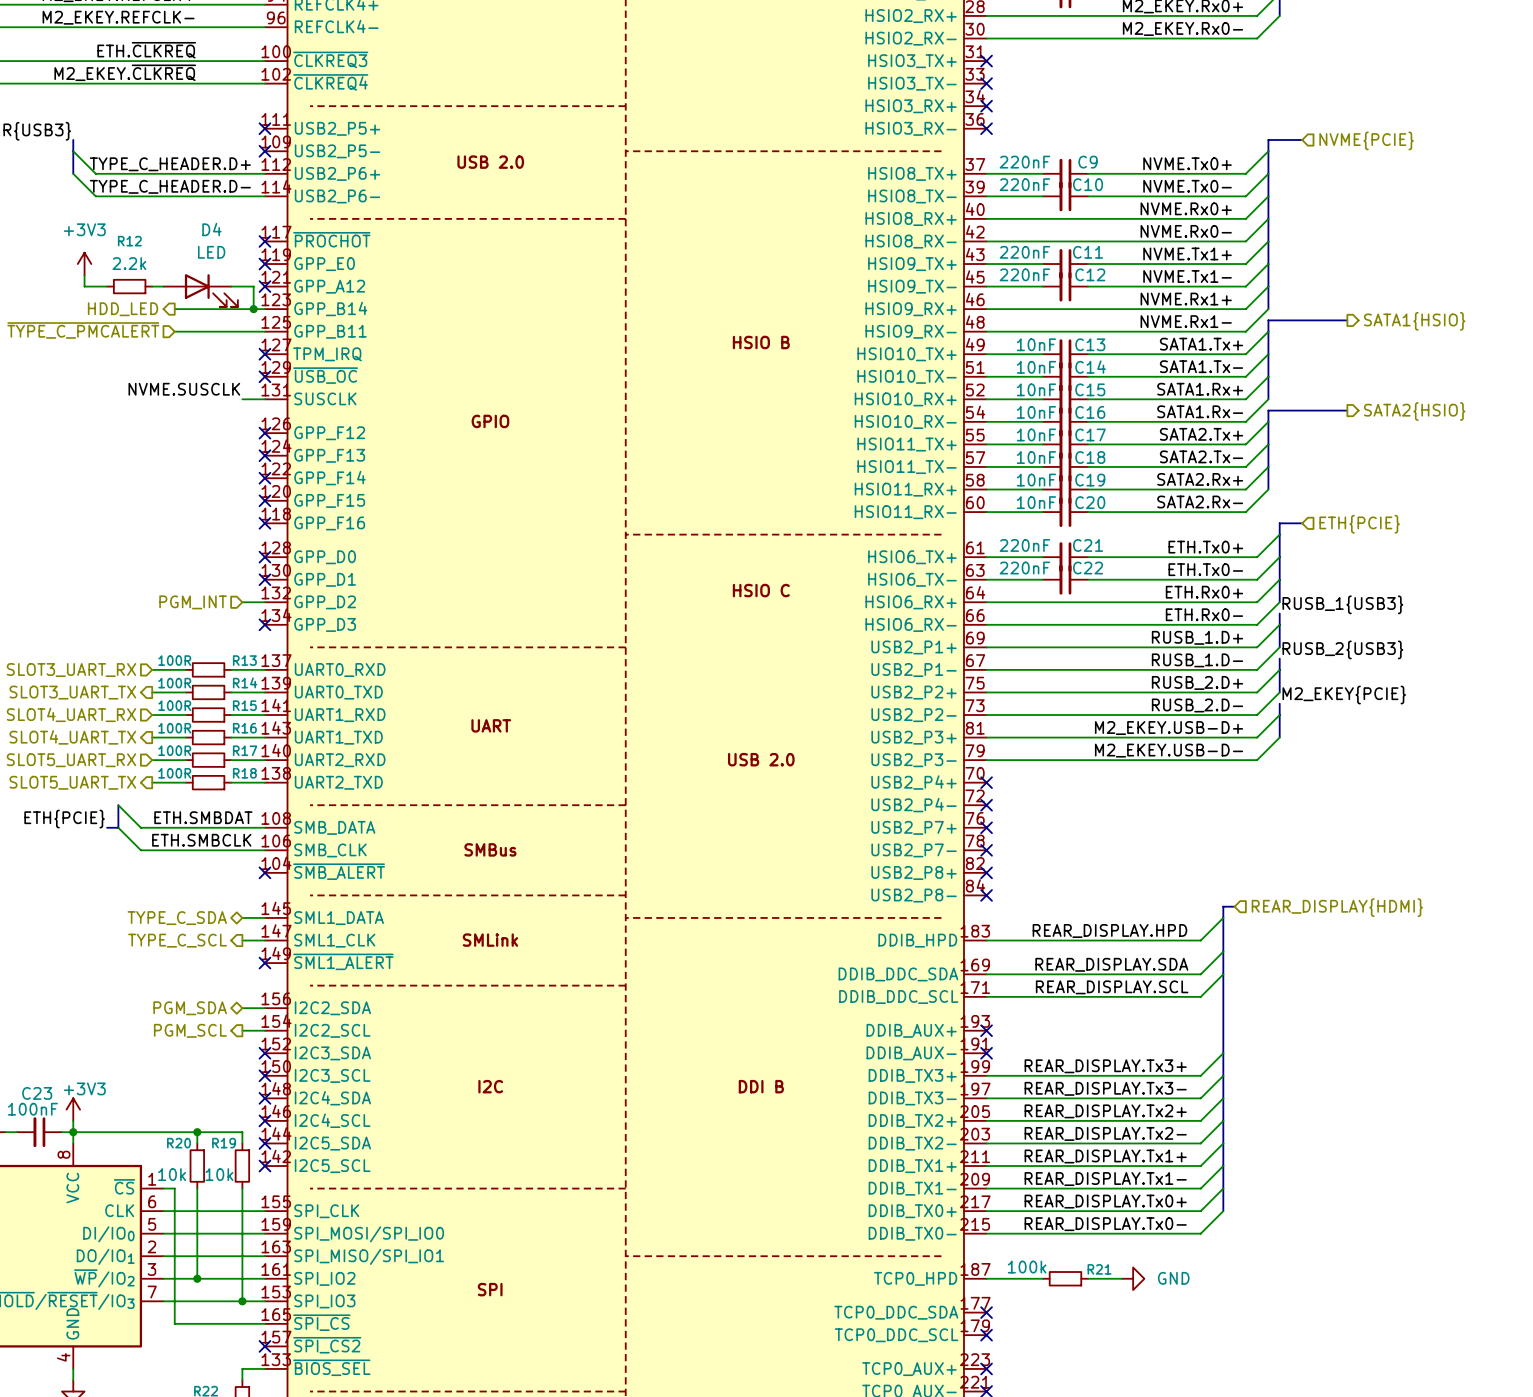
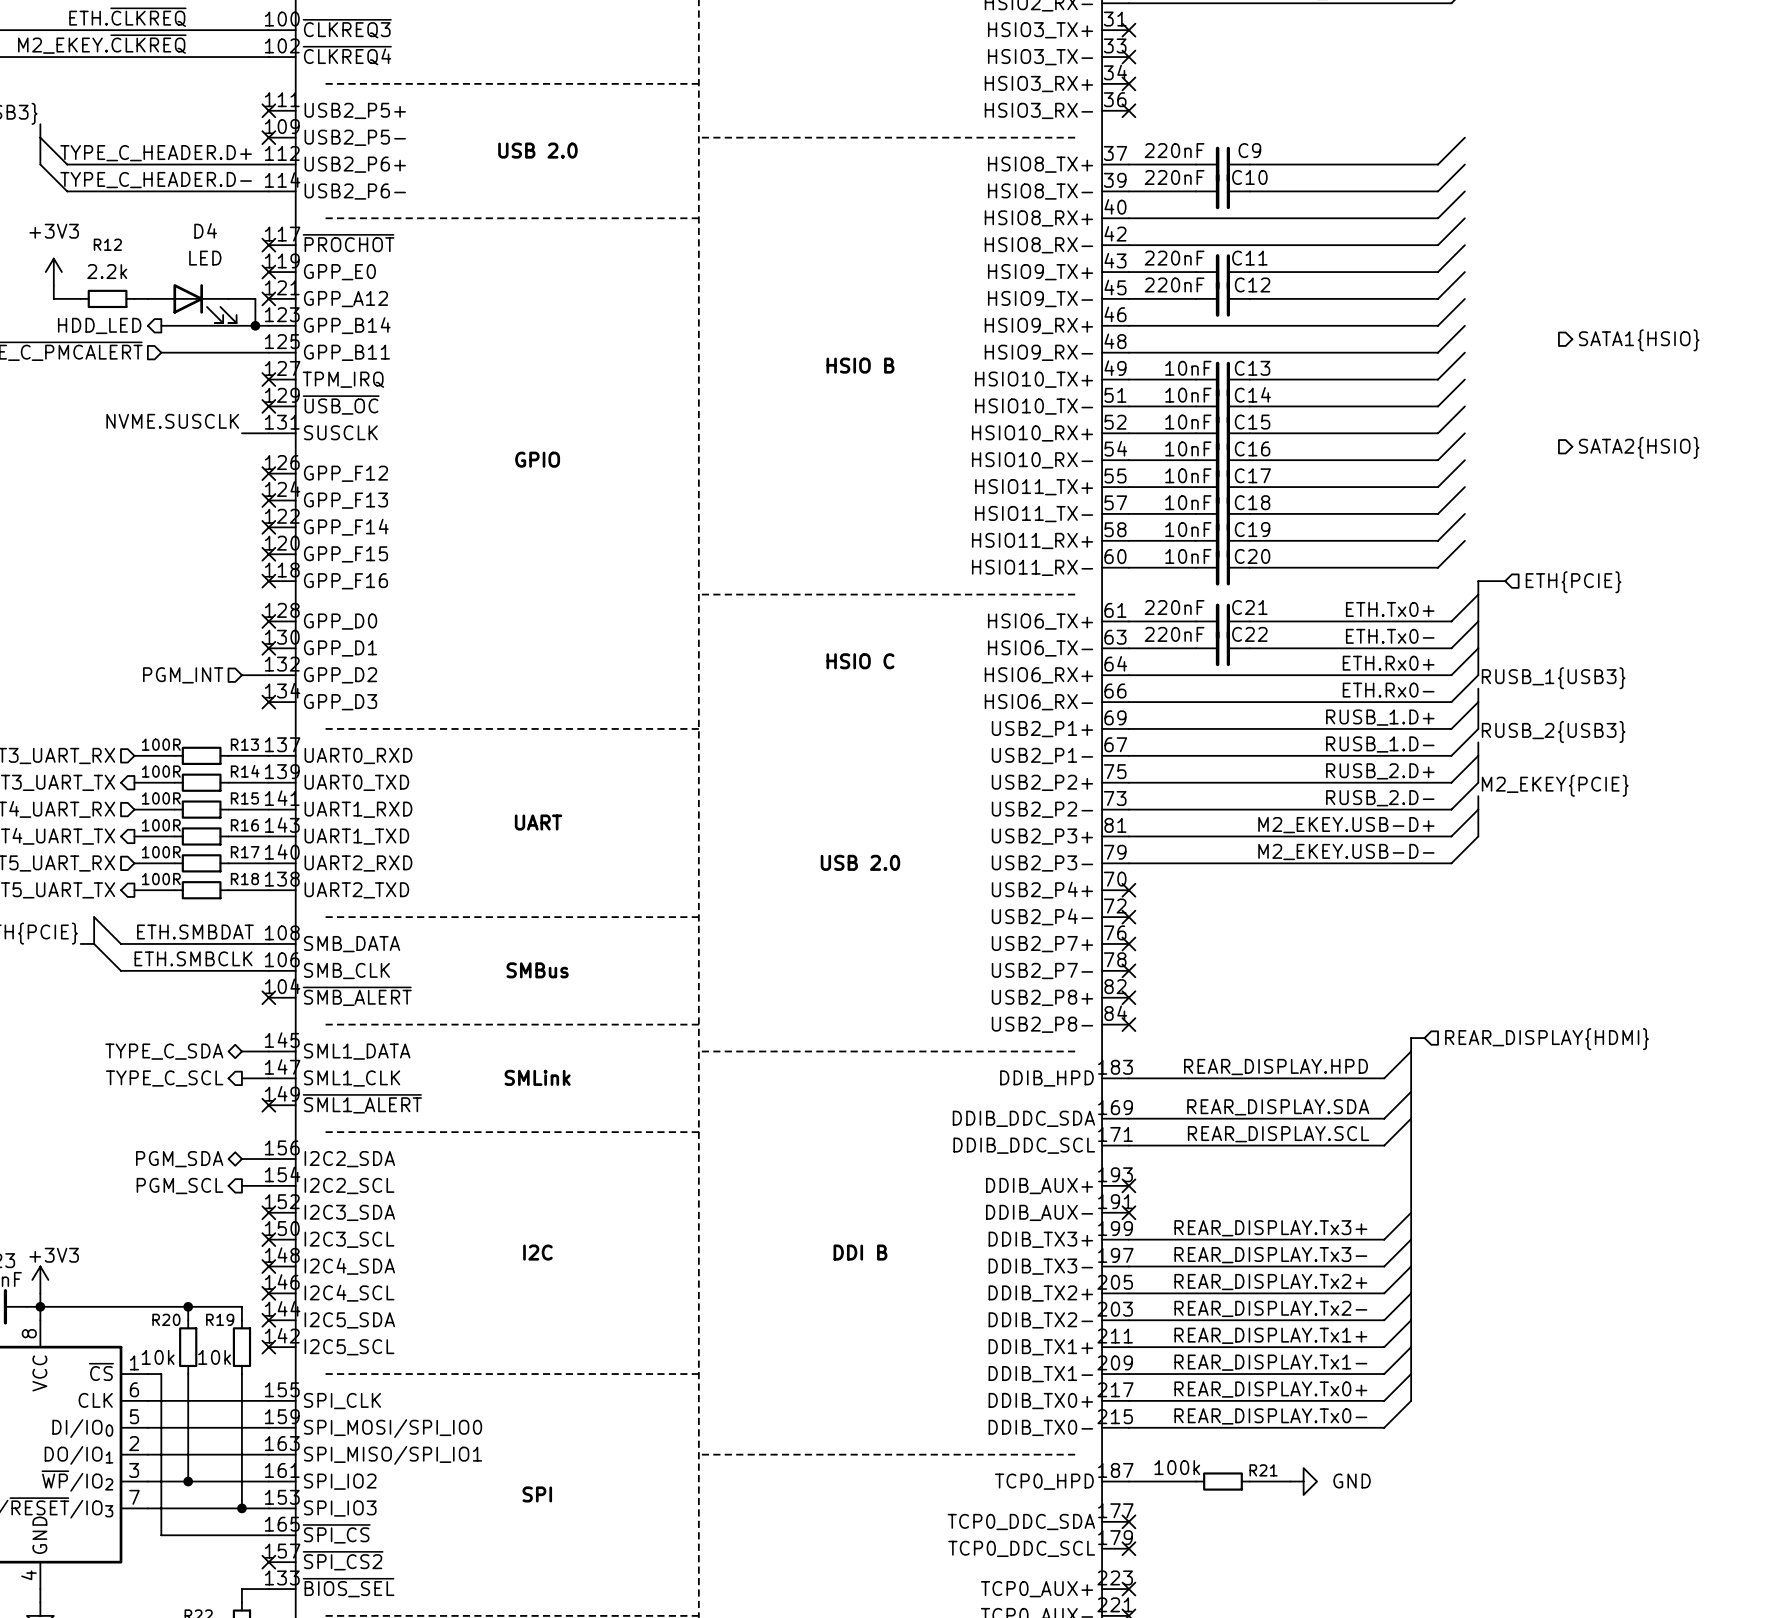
bus: (1302, 139) (1268, 139) (1268, 309) -> none
hierarchical label: NVME{PCIE} (1366, 140) -> none
label: NVME.Tx0+ (1187, 163) -> none
label: NVME.Tx0- (1187, 186) -> none
label: NVME.Rx0+ (1186, 208) -> none
label: NVME.Rx0- (1186, 231) -> none
label: NVME.Tx1+ (1187, 253) -> none
label: NVME.Tx1- (1187, 276) -> none
label: NVME.Rx1+ (1186, 299) -> none
bus: (1347, 320) (1268, 320) (1268, 399) -> none
label: NVME.Rx1- (1186, 321) -> none
label: SATA1.Tx+ (1201, 344) -> none
label: SATA1.Tx- (1201, 366) -> none
label: SATA1.Rx+ (1200, 389) -> none
bus: (1347, 410) (1268, 410) (1268, 489) -> none
label: SATA1.Rx- (1200, 411) -> none
label: SATA2.Tx+ (1201, 434) -> none
label: SATA2.Tx- (1201, 456) -> none
label: SATA2.Rx+ (1200, 479) -> none
label: SATA2.Rx- (1200, 502) -> none

